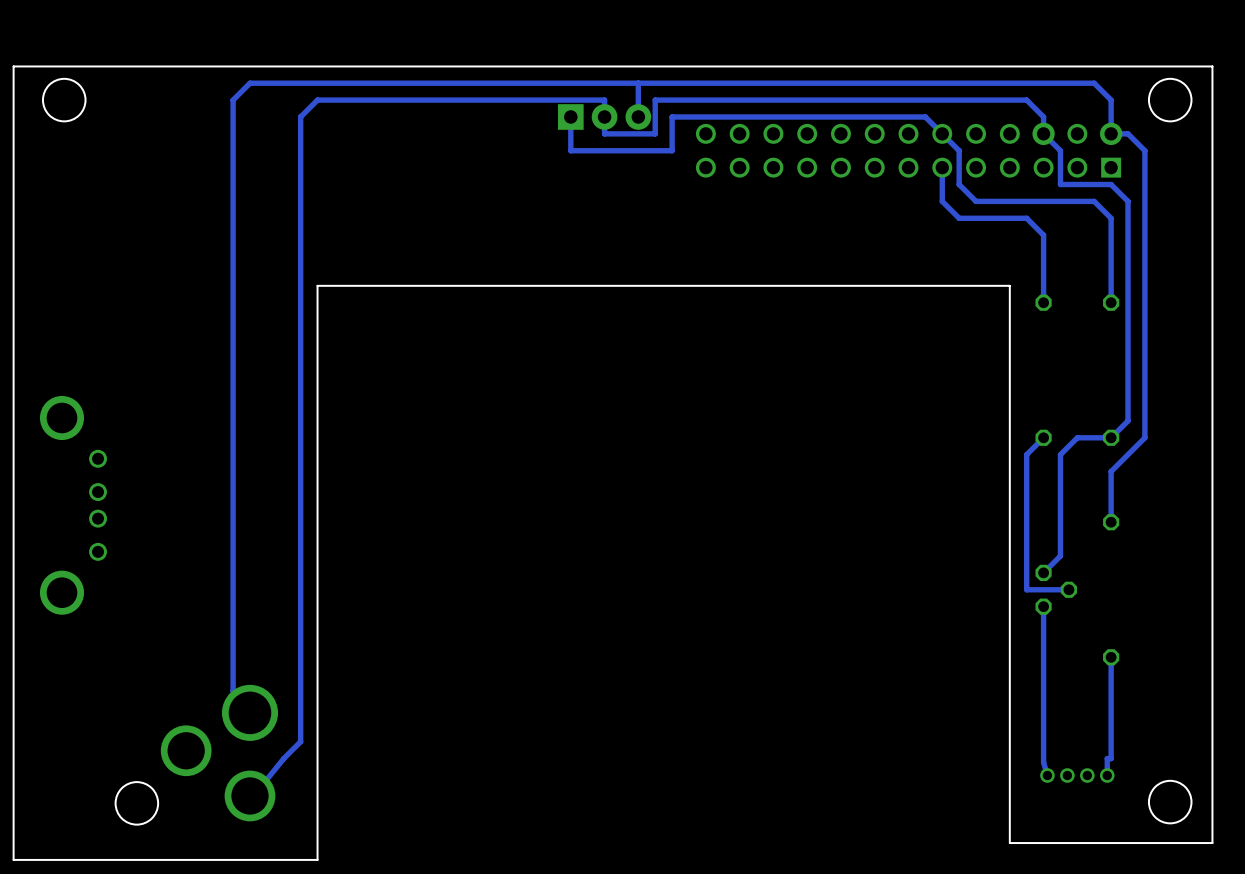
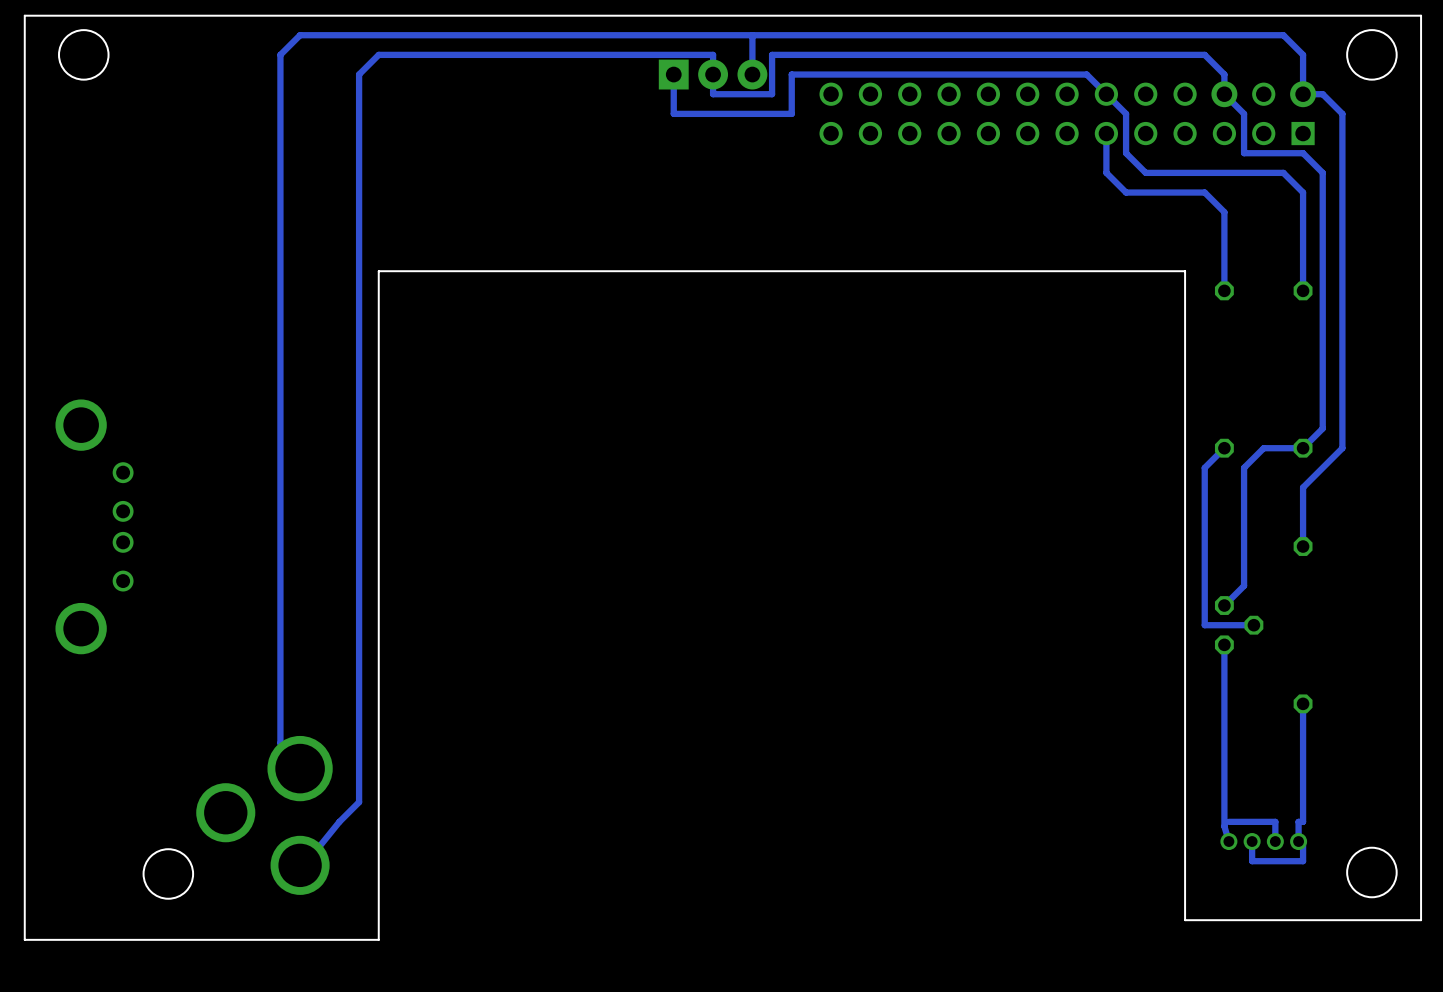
track: none -> (1228, 821) (1275, 821) (1275, 841)
track: none -> (1298, 841) (1303, 841) (1303, 861) (1252, 861) (1252, 841)

